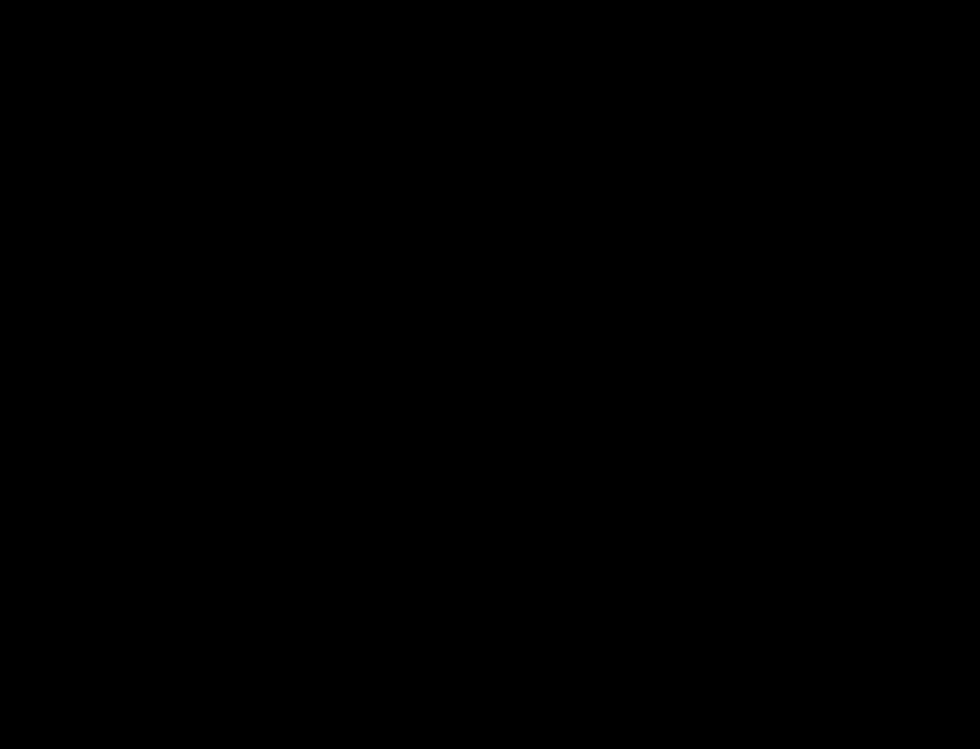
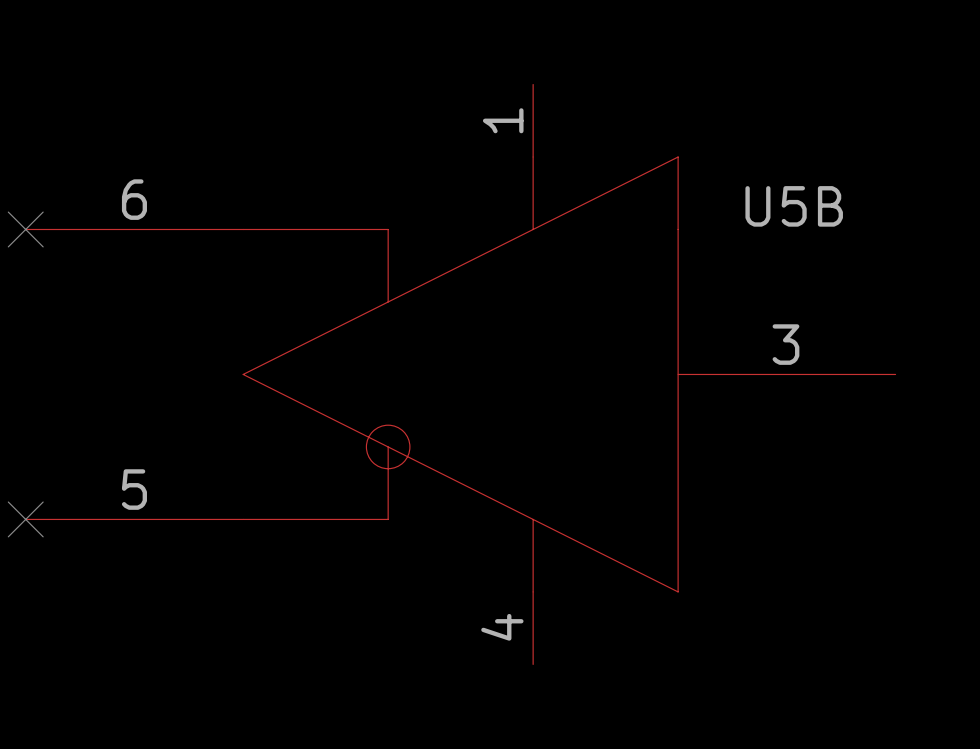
no-connect mark: none -> (25, 229)
U5B: none -> (460, 374)
no-connect mark: none -> (25, 519)

